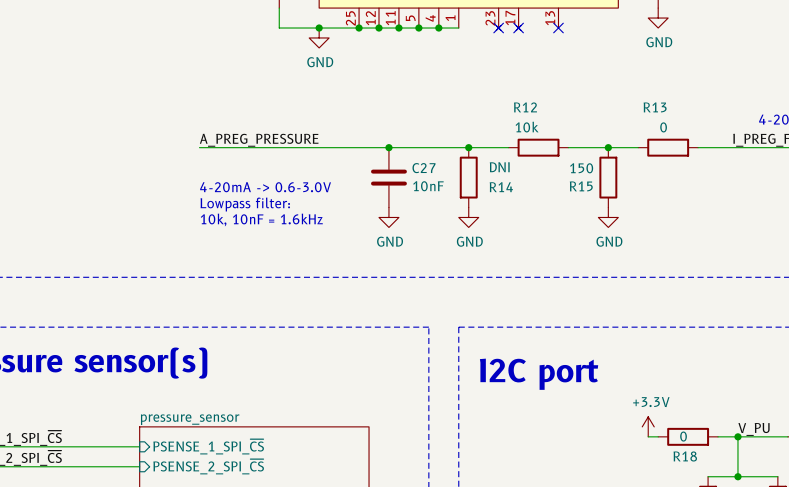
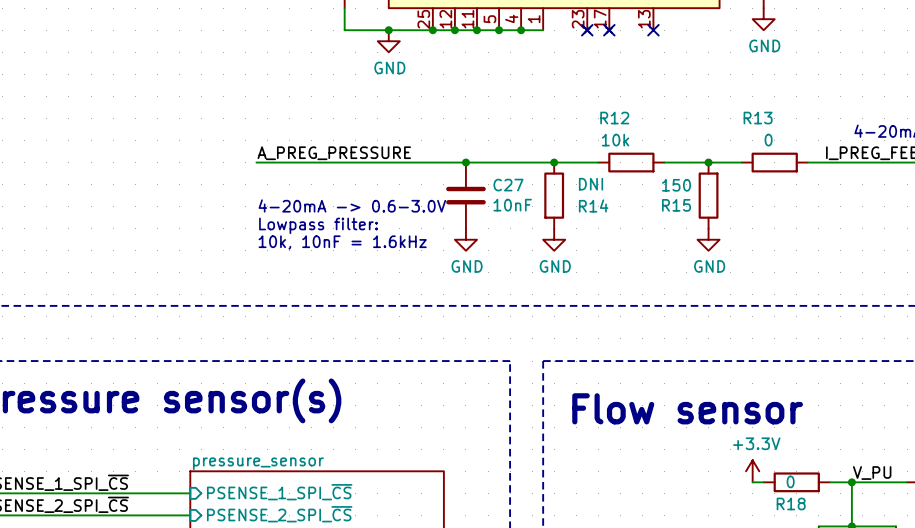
text: I2C port (539, 374) -> Flow sensor (687, 408)

